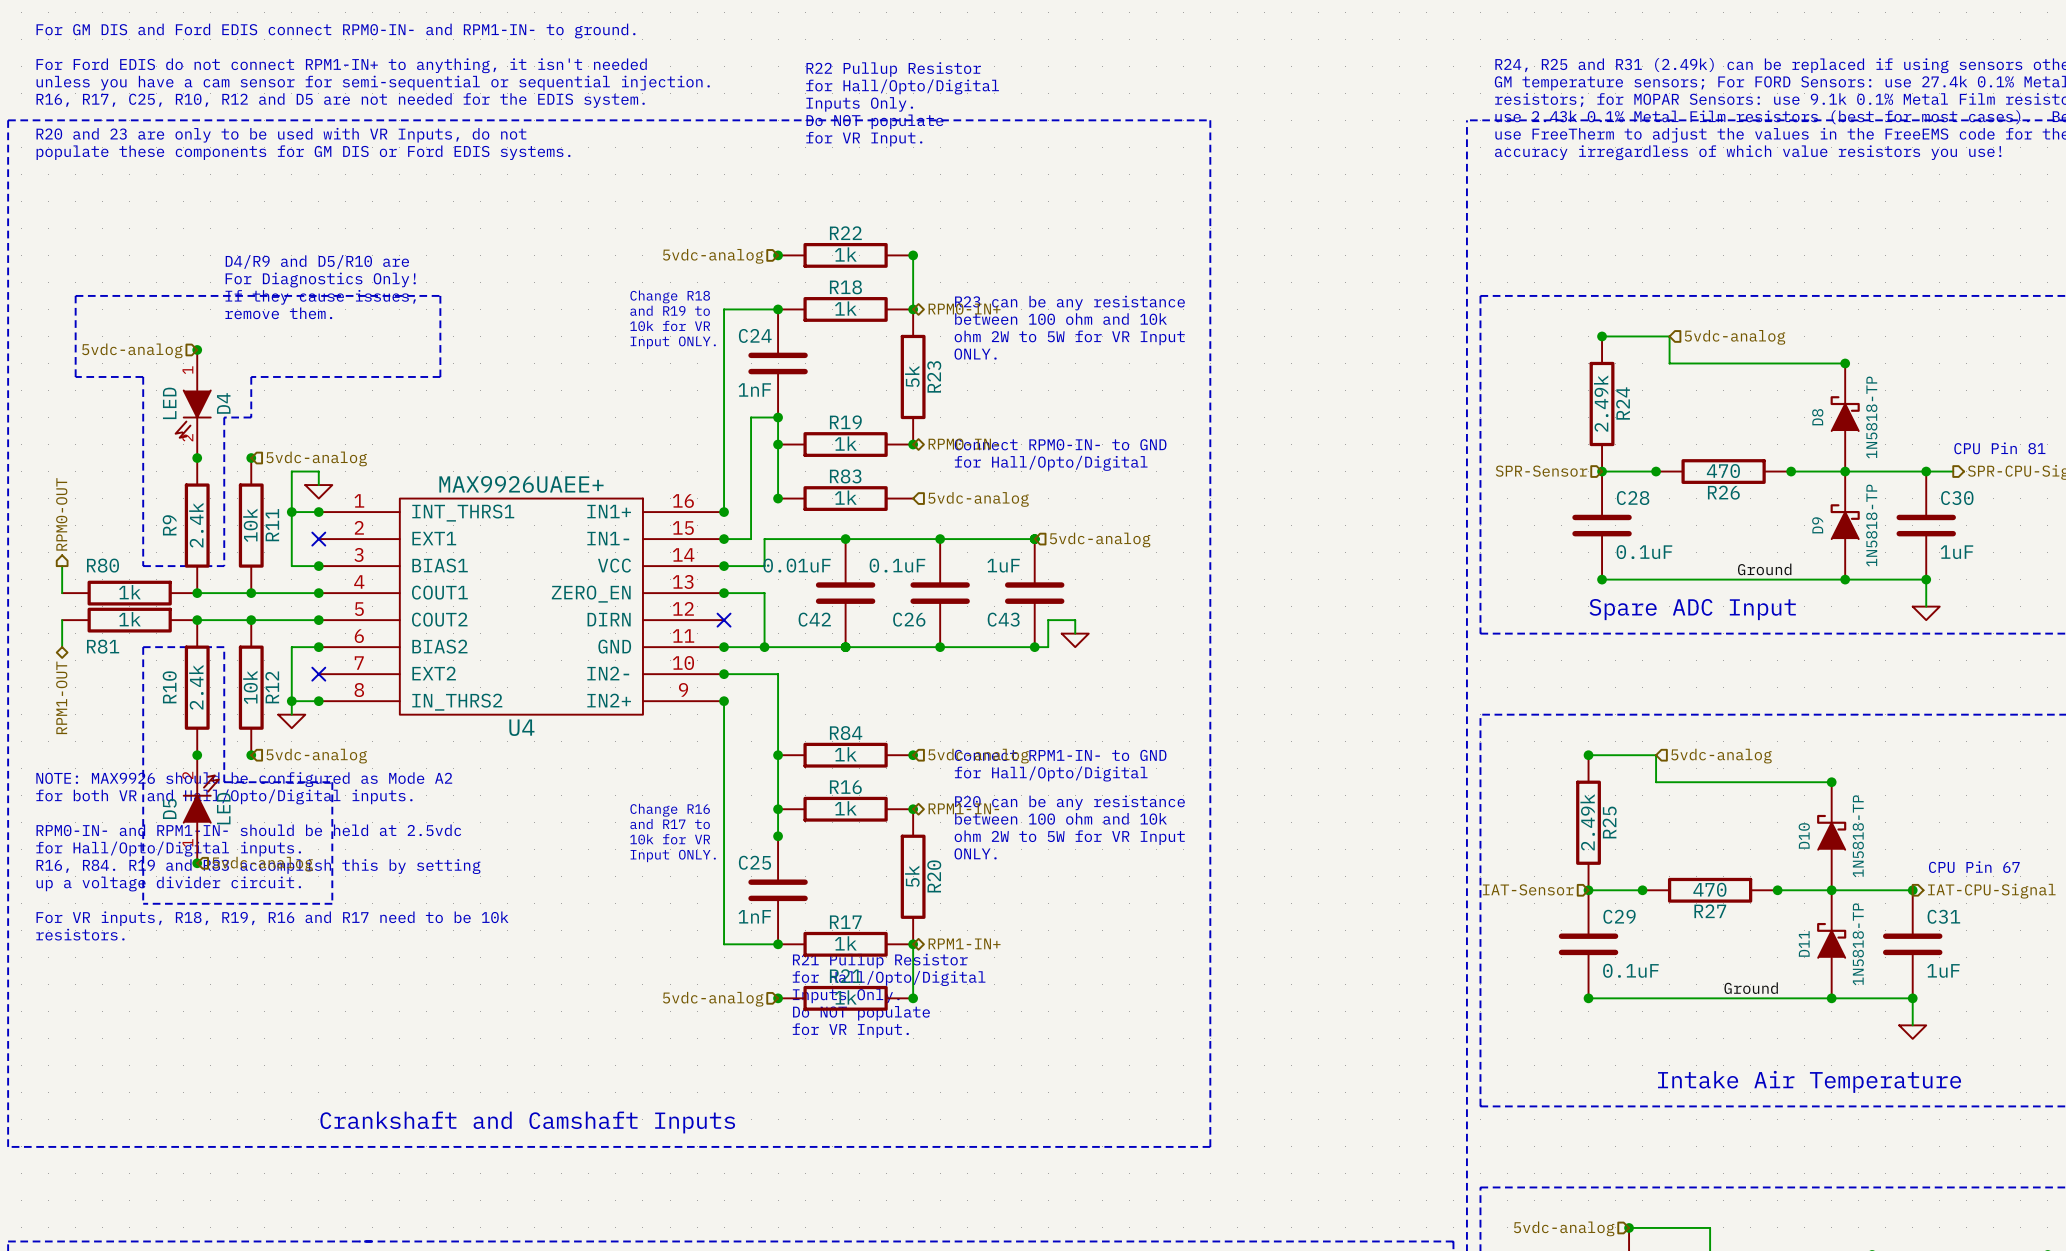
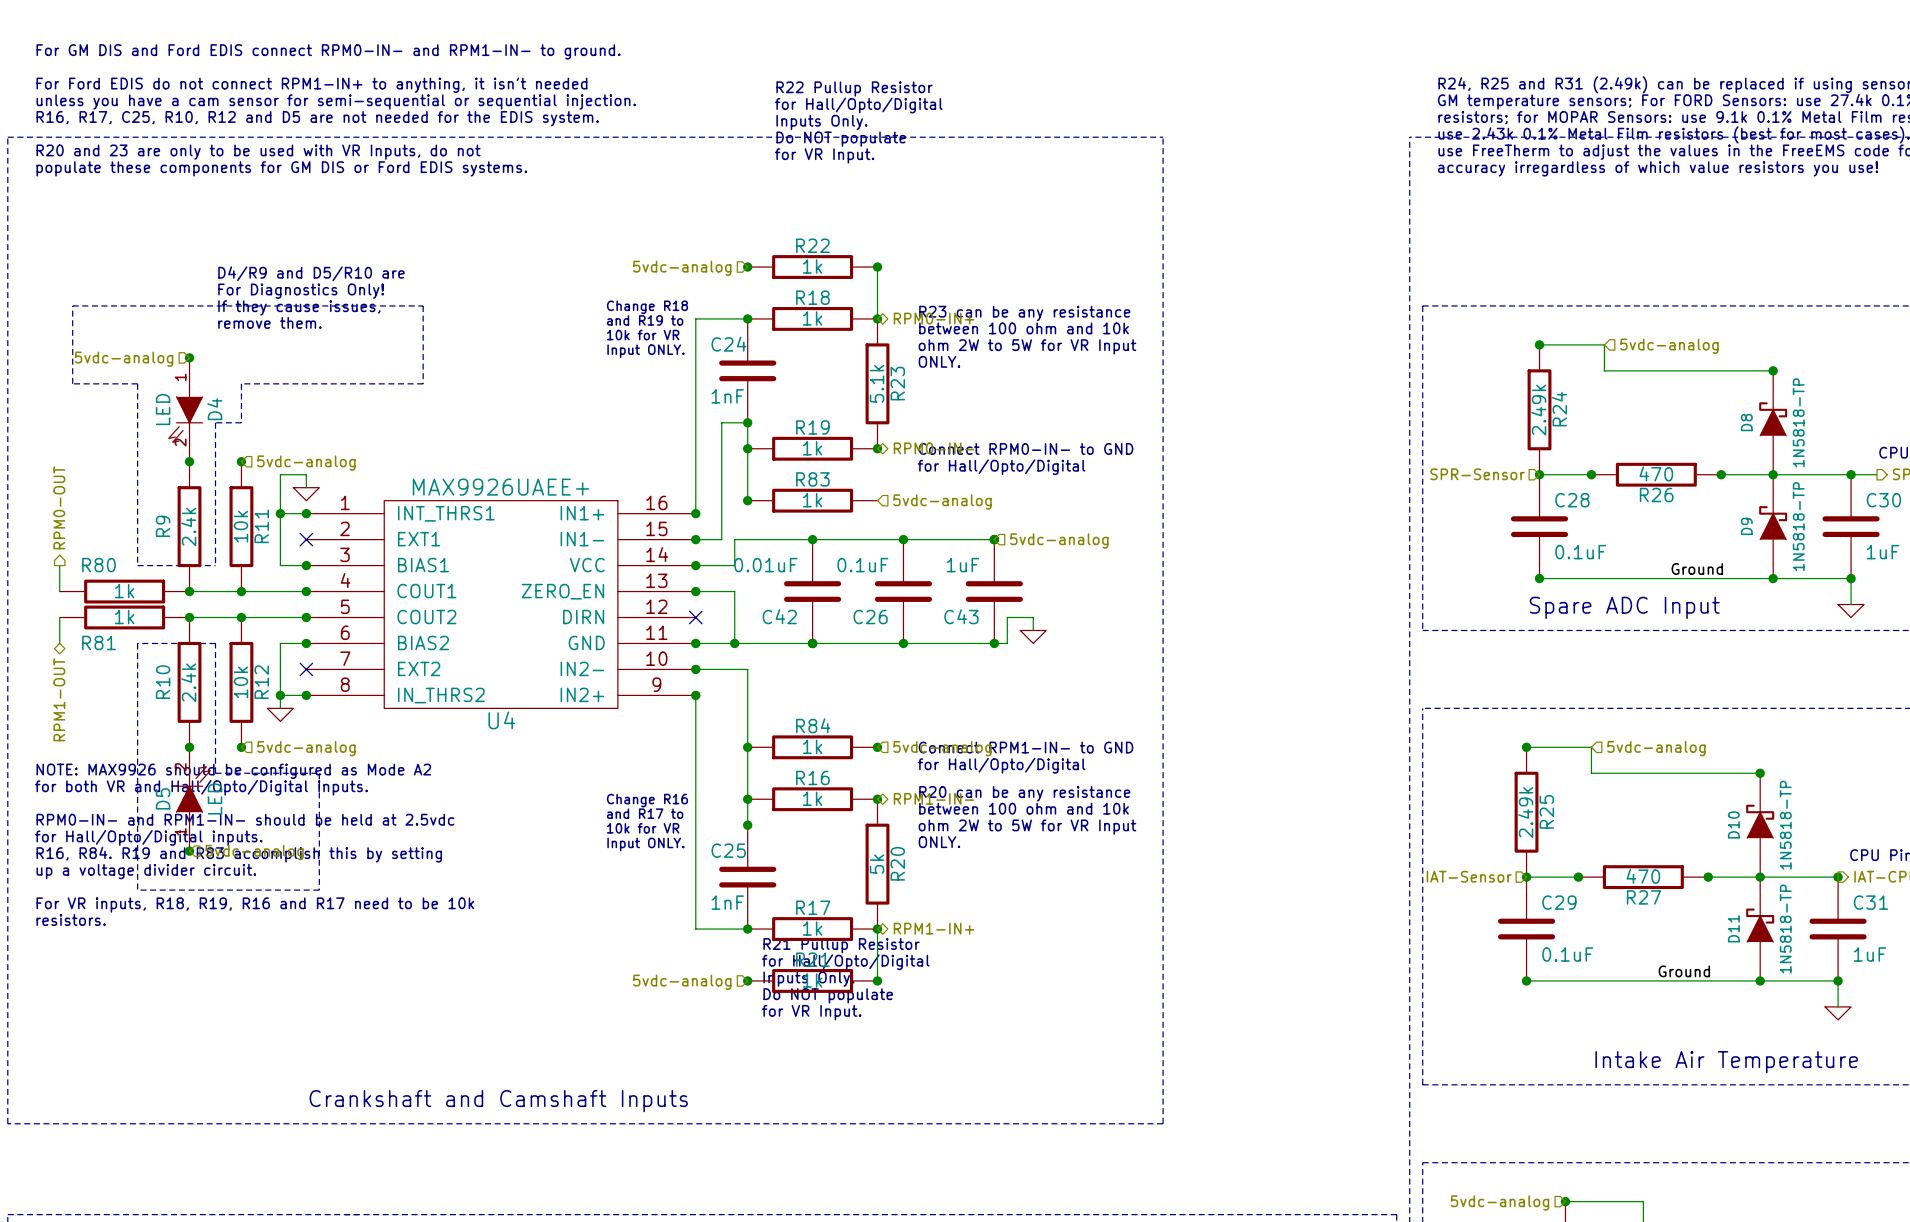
R23 value: 5k (912, 376) -> 5.1k (877, 383)

